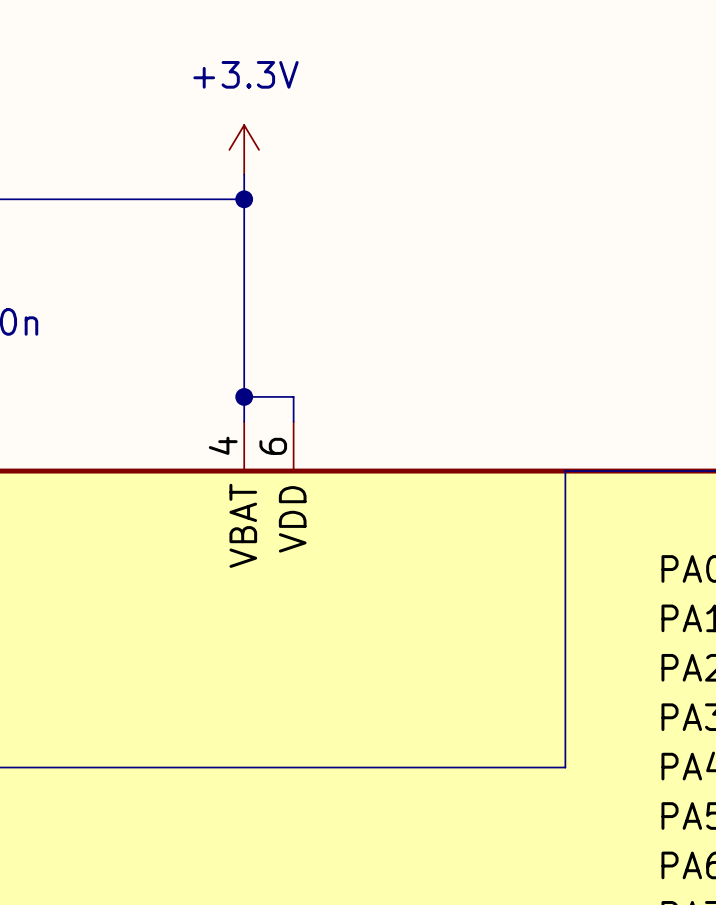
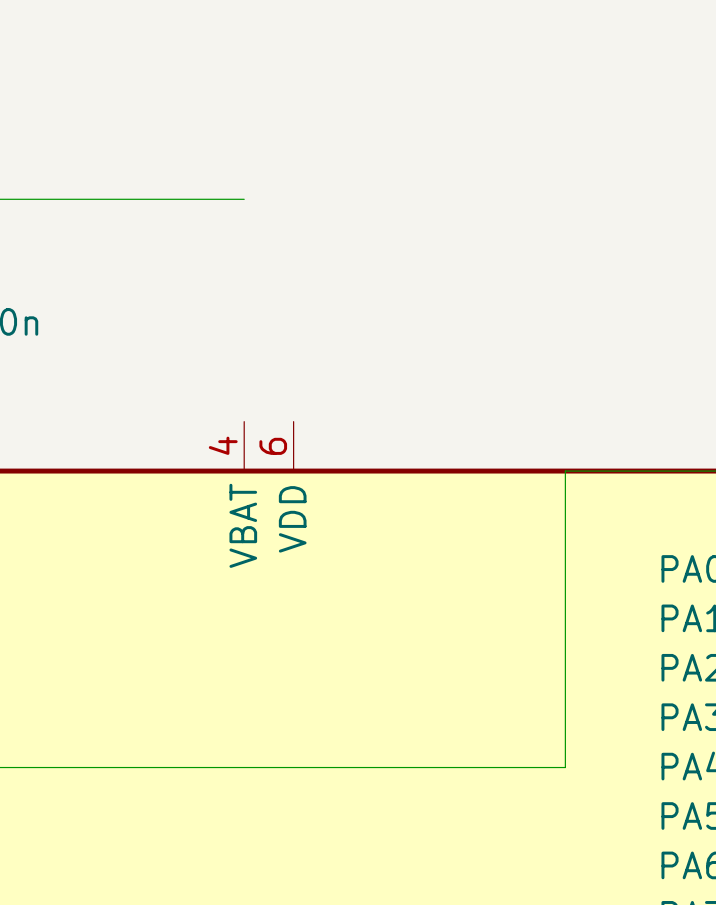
power symbol: +3.3V (244, 149) -> none
wire: (244, 174) (244, 421) -> none
junction: (244, 199) -> none
wire: (244, 396) (293, 396) (293, 421) -> none
junction: (244, 396) -> none

